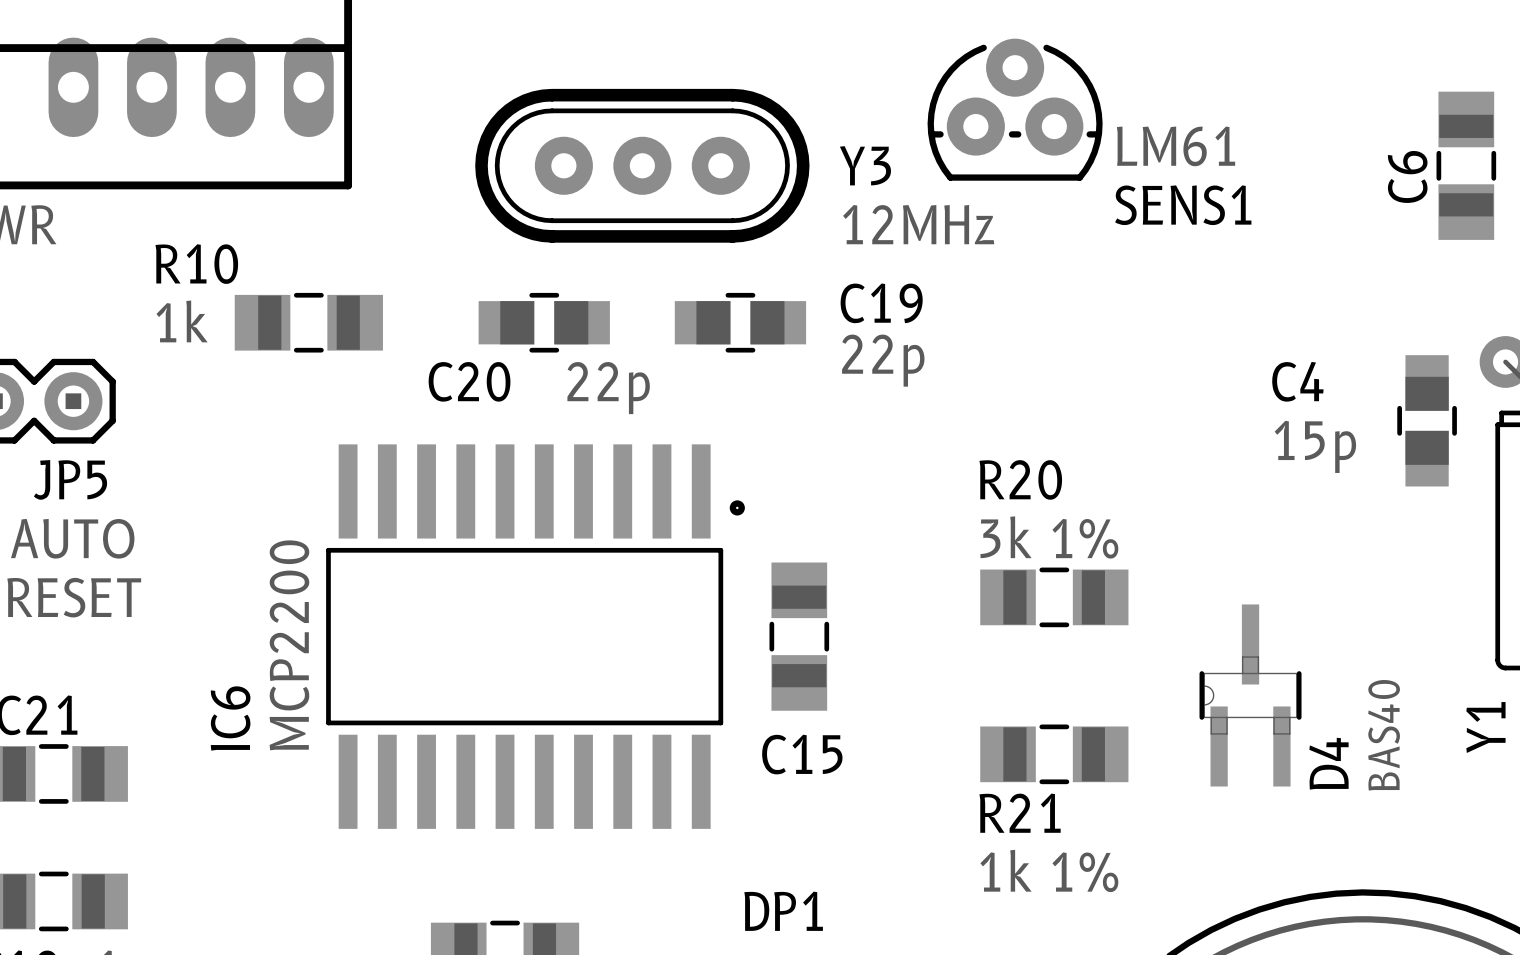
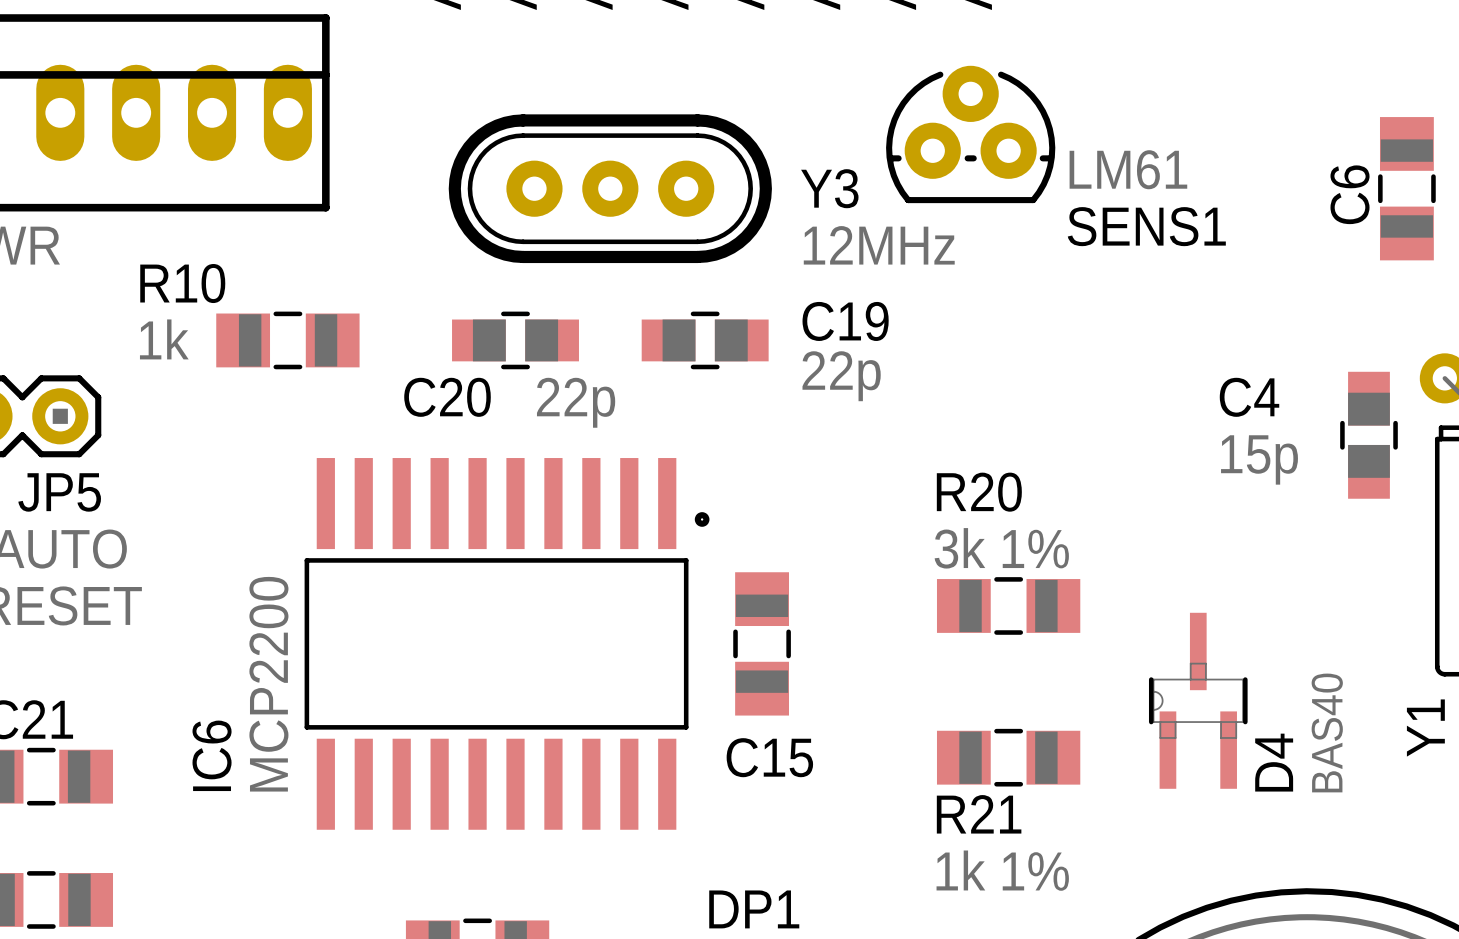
IC6 value position: MCP2200 (289, 645) -> MCP2200 (268, 684)
IC6 name position: IC6 (230, 718) -> IC6 (212, 755)

